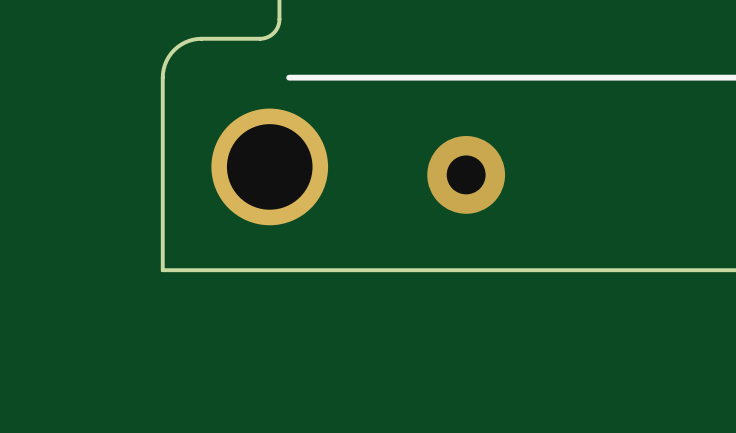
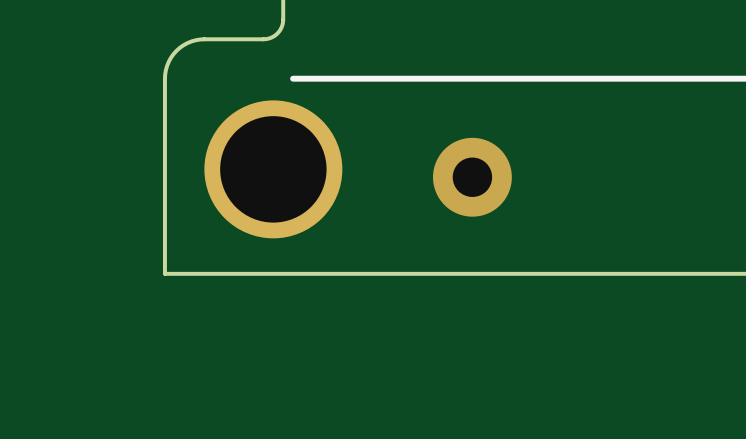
part footprint: [211, 108, 329, 226] -> [204, 100, 343, 239]

